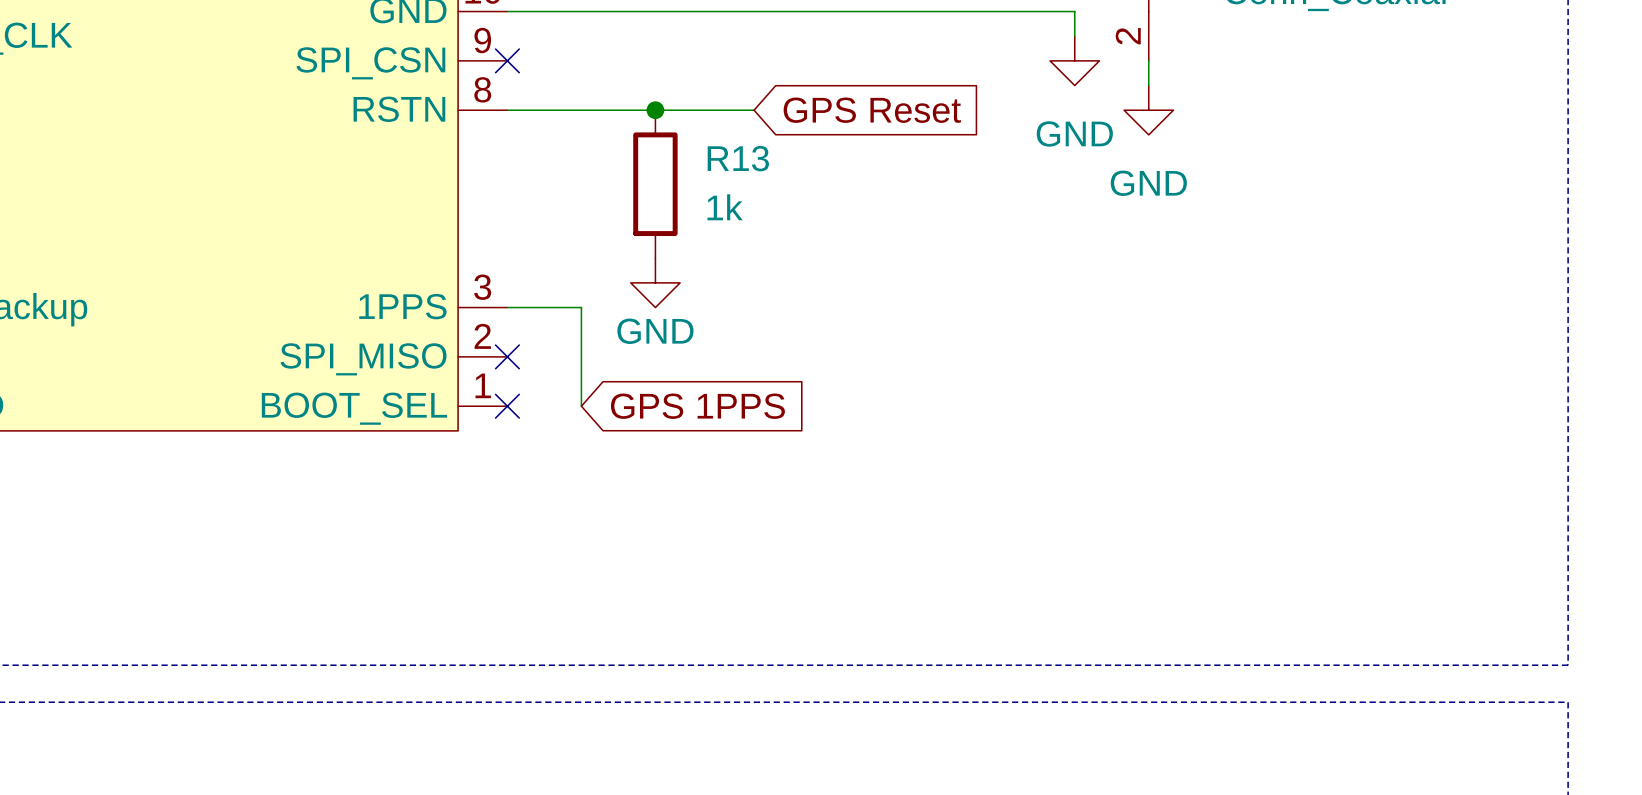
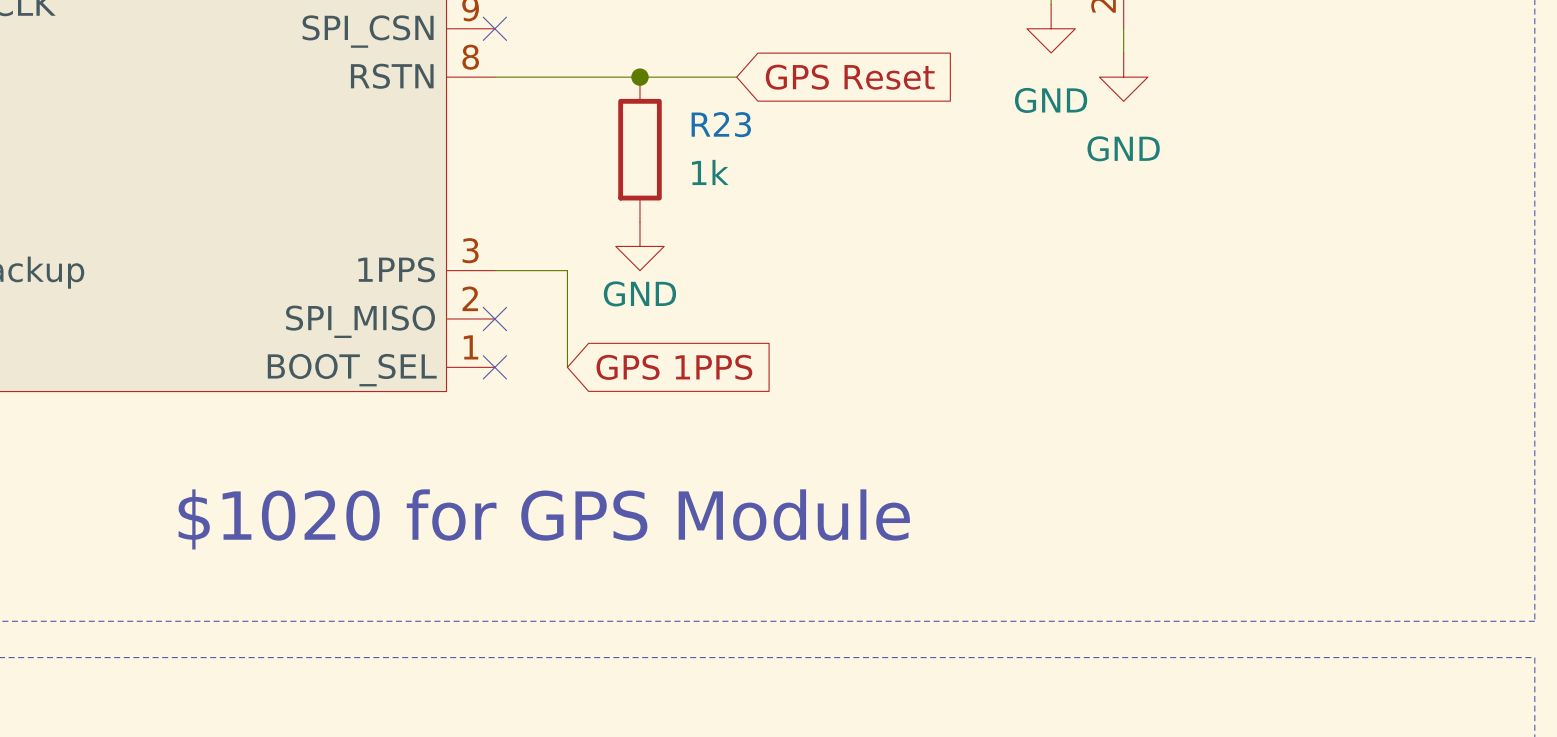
R13 name: R13 (738, 158) -> R23 (721, 124)
text: none -> $1020 for GPS Module (544, 519)

